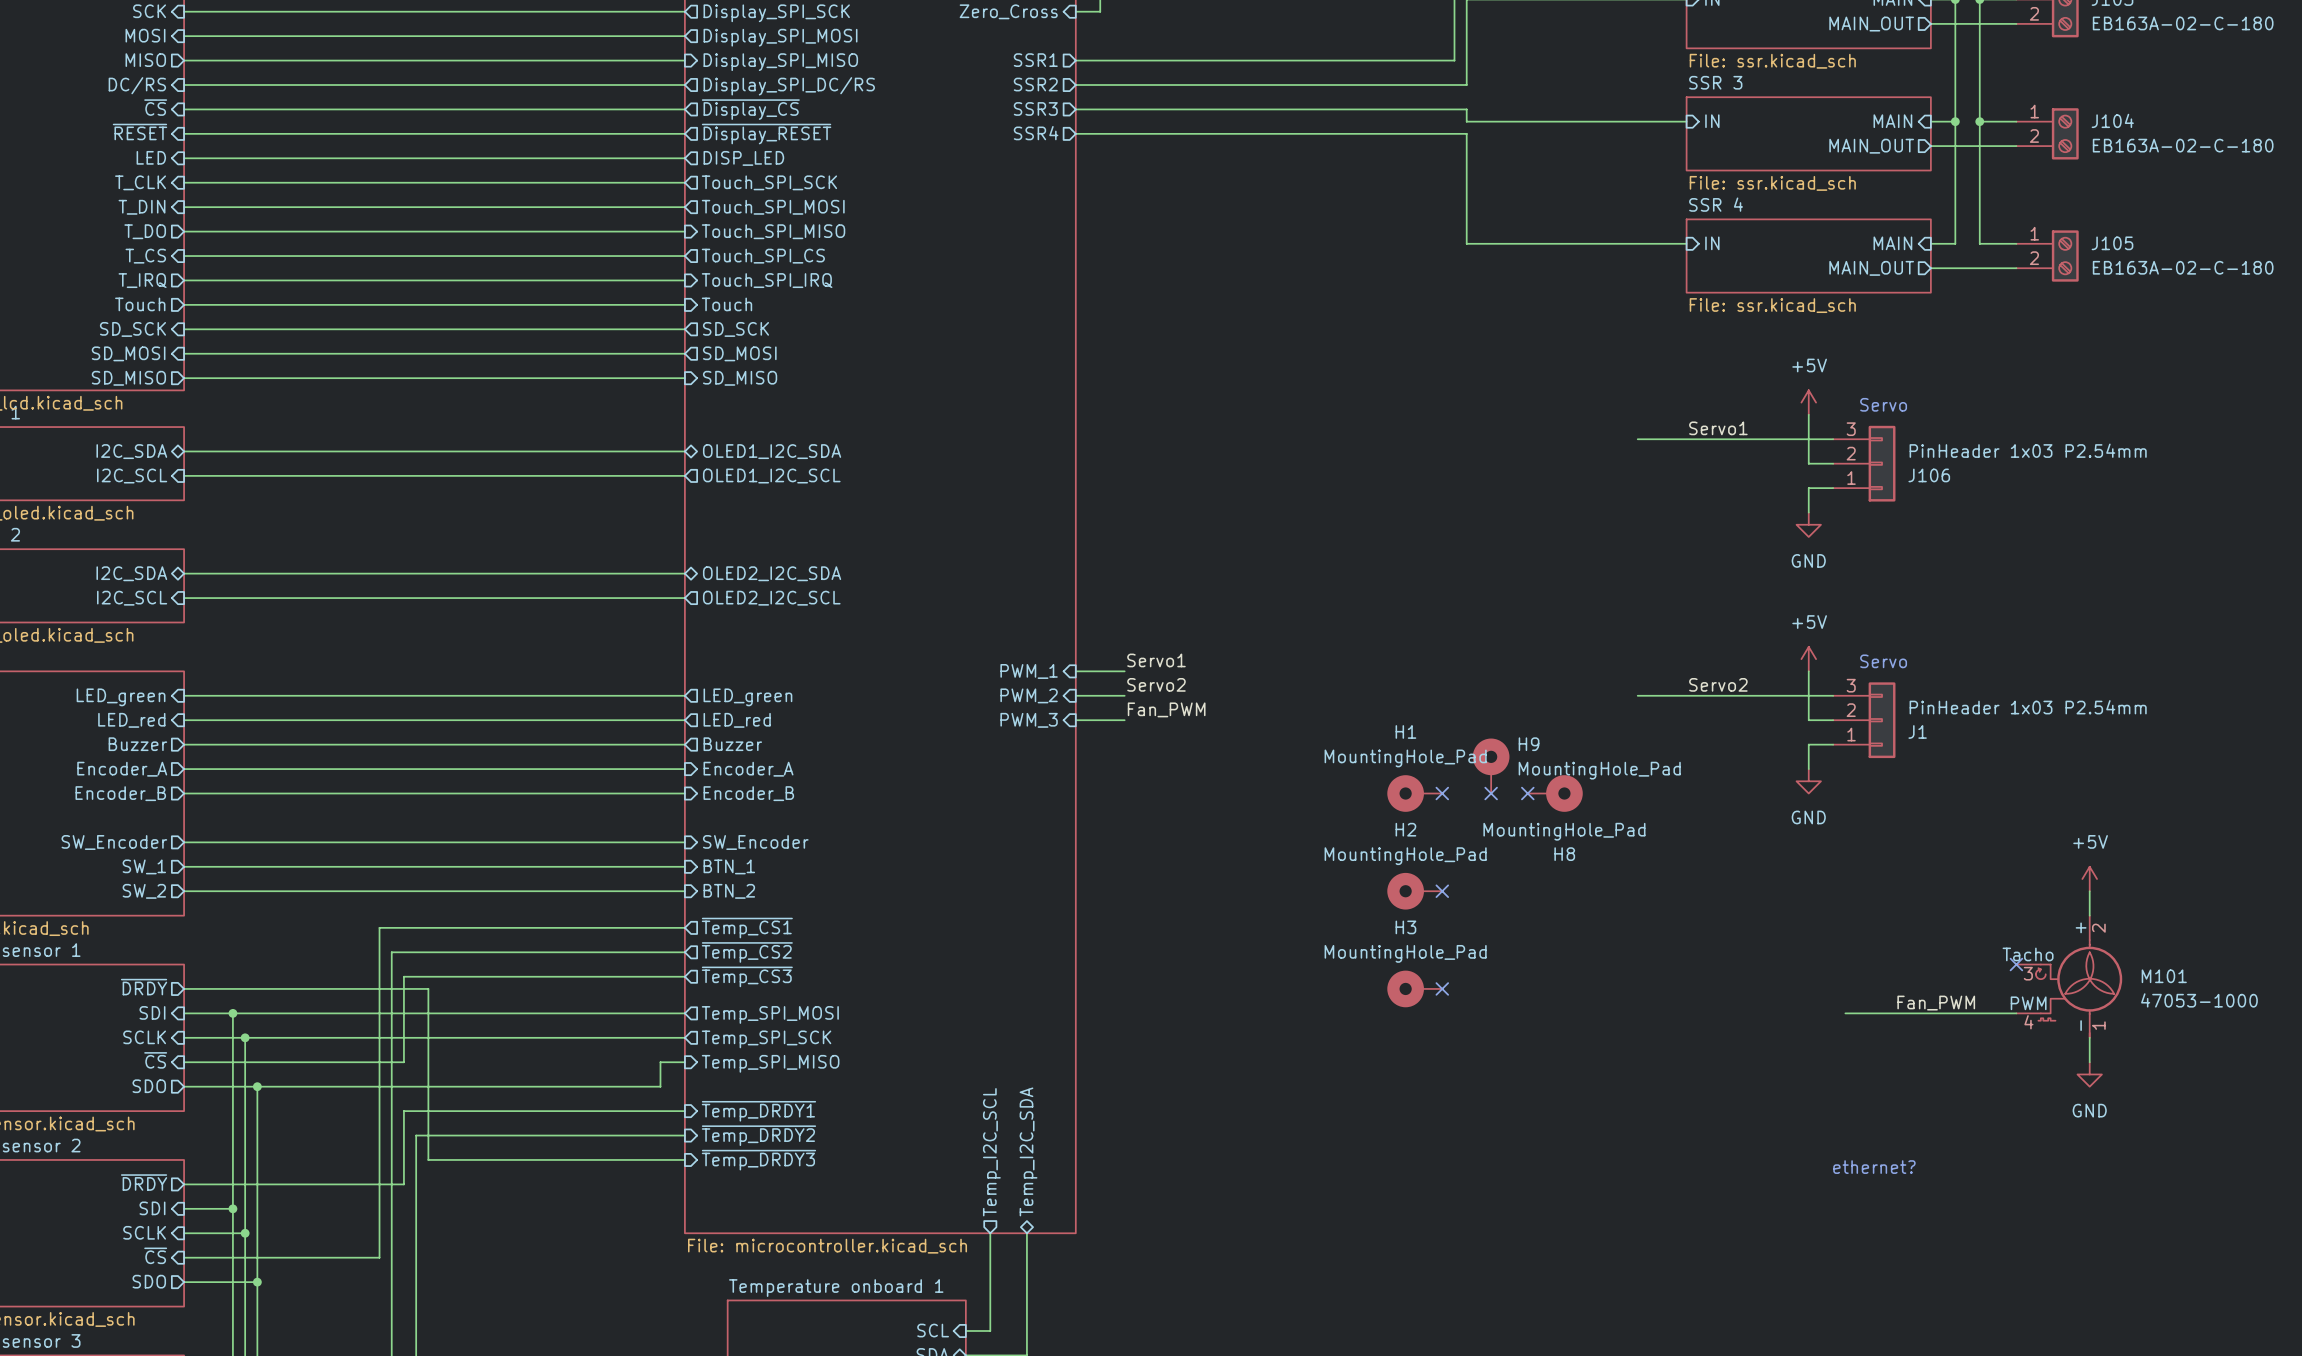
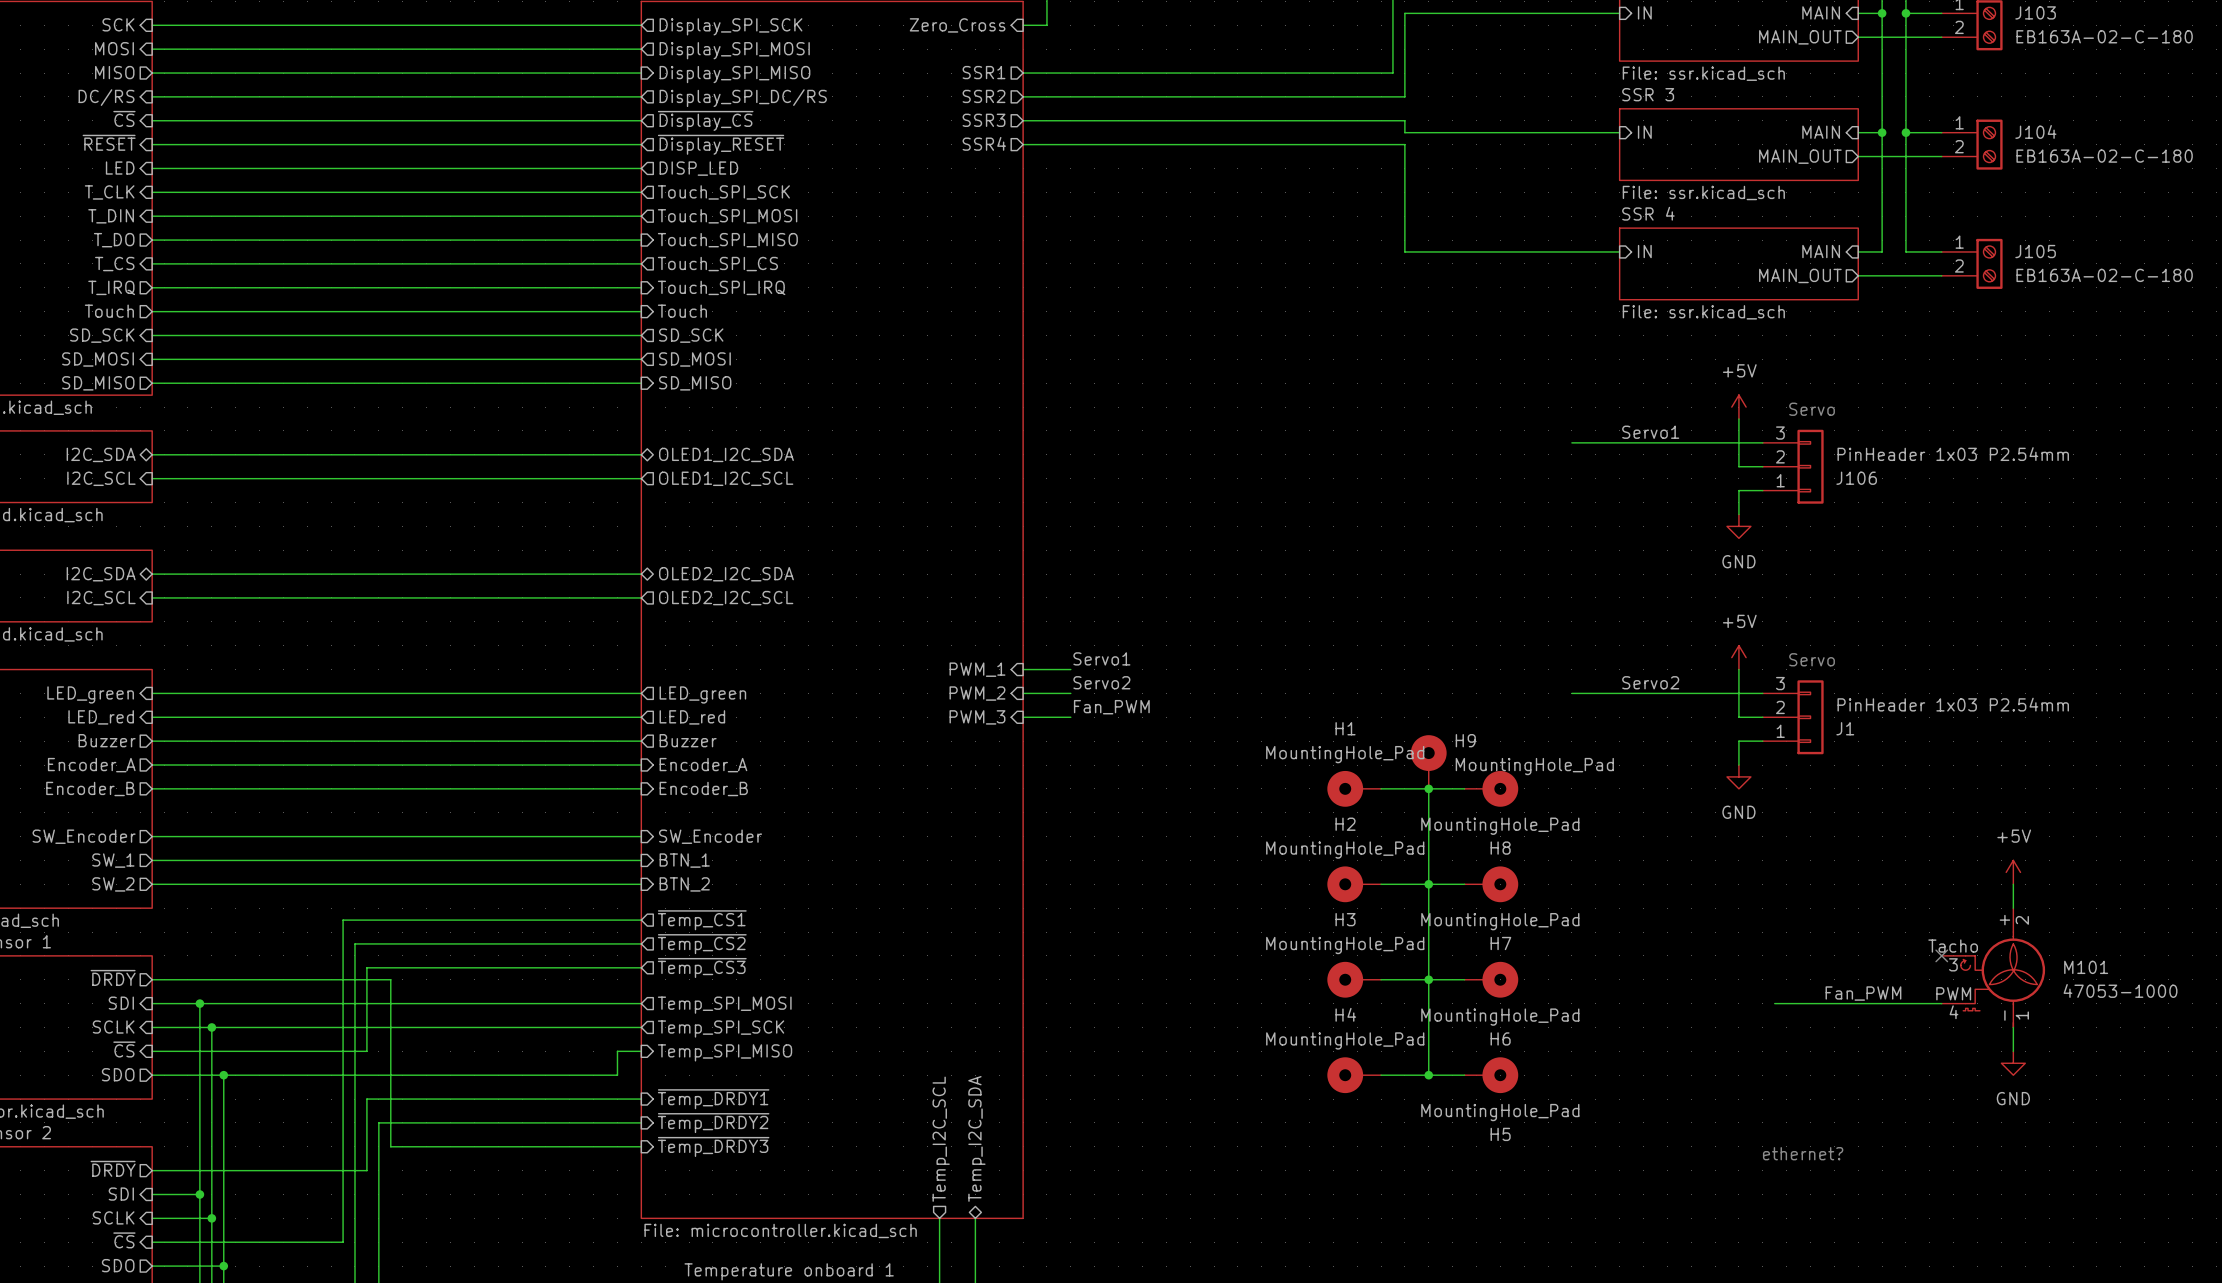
wire: none -> (1381, 788) (1464, 788)
no-connect mark: (1442, 793) -> none
wire: none -> (1428, 788) (1428, 1075)
no-connect mark: (1491, 793) -> none
junction: none -> (1428, 788)
no-connect mark: (1527, 793) -> none
wire: none -> (1381, 884) (1464, 884)
no-connect mark: (1442, 891) -> none
junction: none -> (1428, 884)
H7: none -> MountingHole_Pad (1491, 884)
wire: none -> (1381, 979) (1464, 979)
no-connect mark: (1442, 988) -> none
junction: none -> (1428, 979)
H6: none -> MountingHole_Pad (1491, 979)
H4: none -> MountingHole_Pad (1354, 1075)
wire: none -> (1381, 1075) (1464, 1075)
junction: none -> (1428, 1075)
H5: none -> MountingHole_Pad (1491, 1075)

